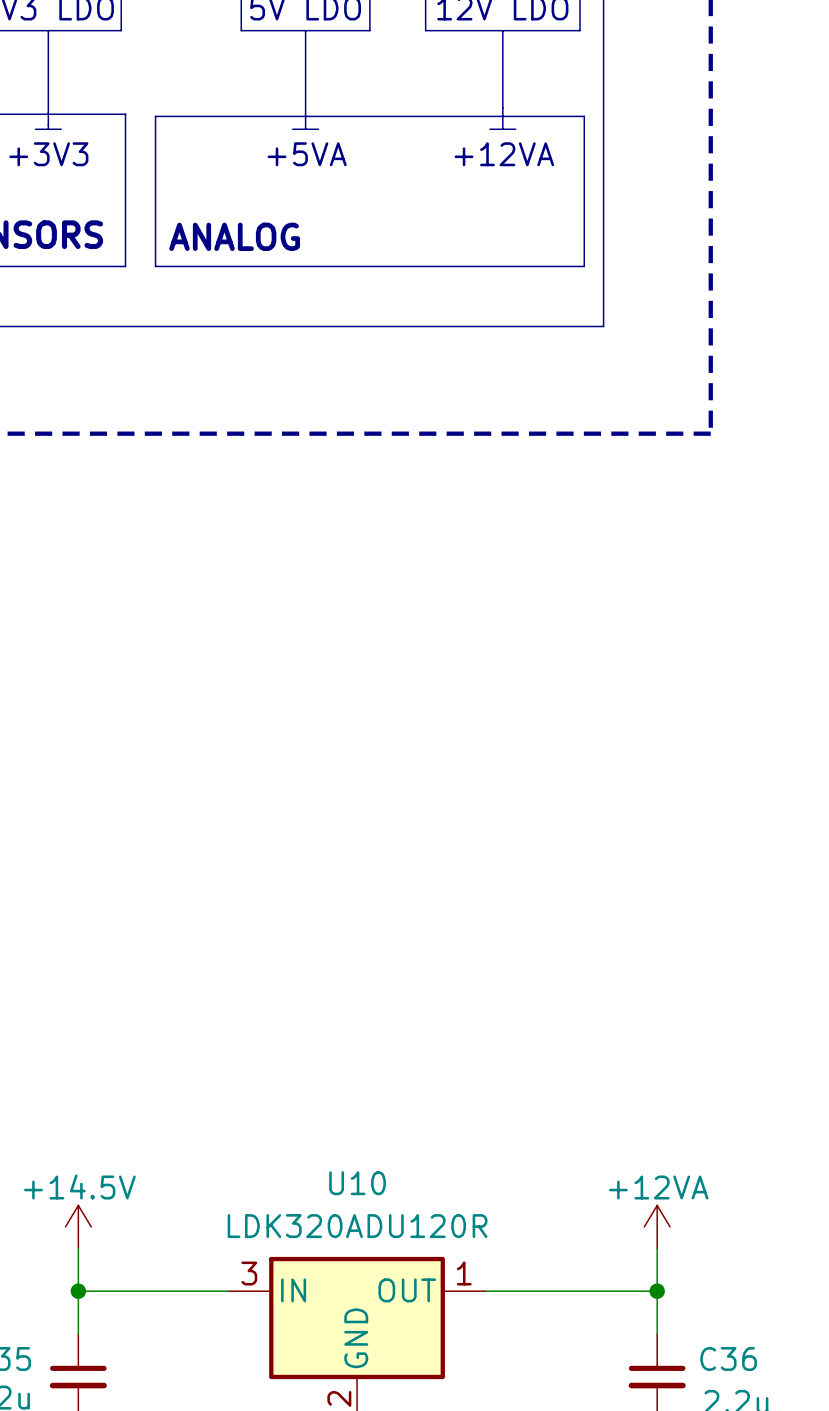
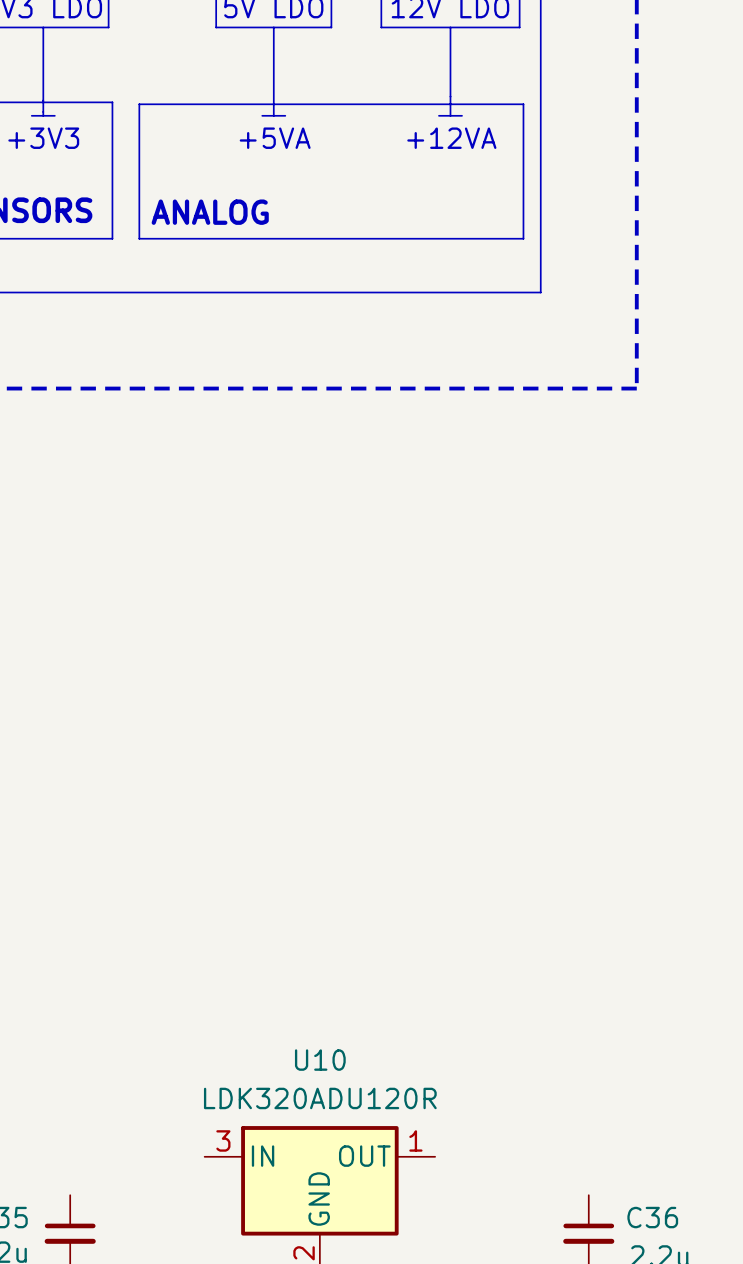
power symbol: +14.5V (78, 1226) -> none
power symbol: +12VA (657, 1226) -> none
wire: (78, 1248) (78, 1334) -> none
wire: (657, 1248) (657, 1334) -> none
wire: (78, 1291) (228, 1291) -> none
junction: (78, 1291) -> none
wire: (485, 1291) (657, 1291) -> none
junction: (657, 1291) -> none

